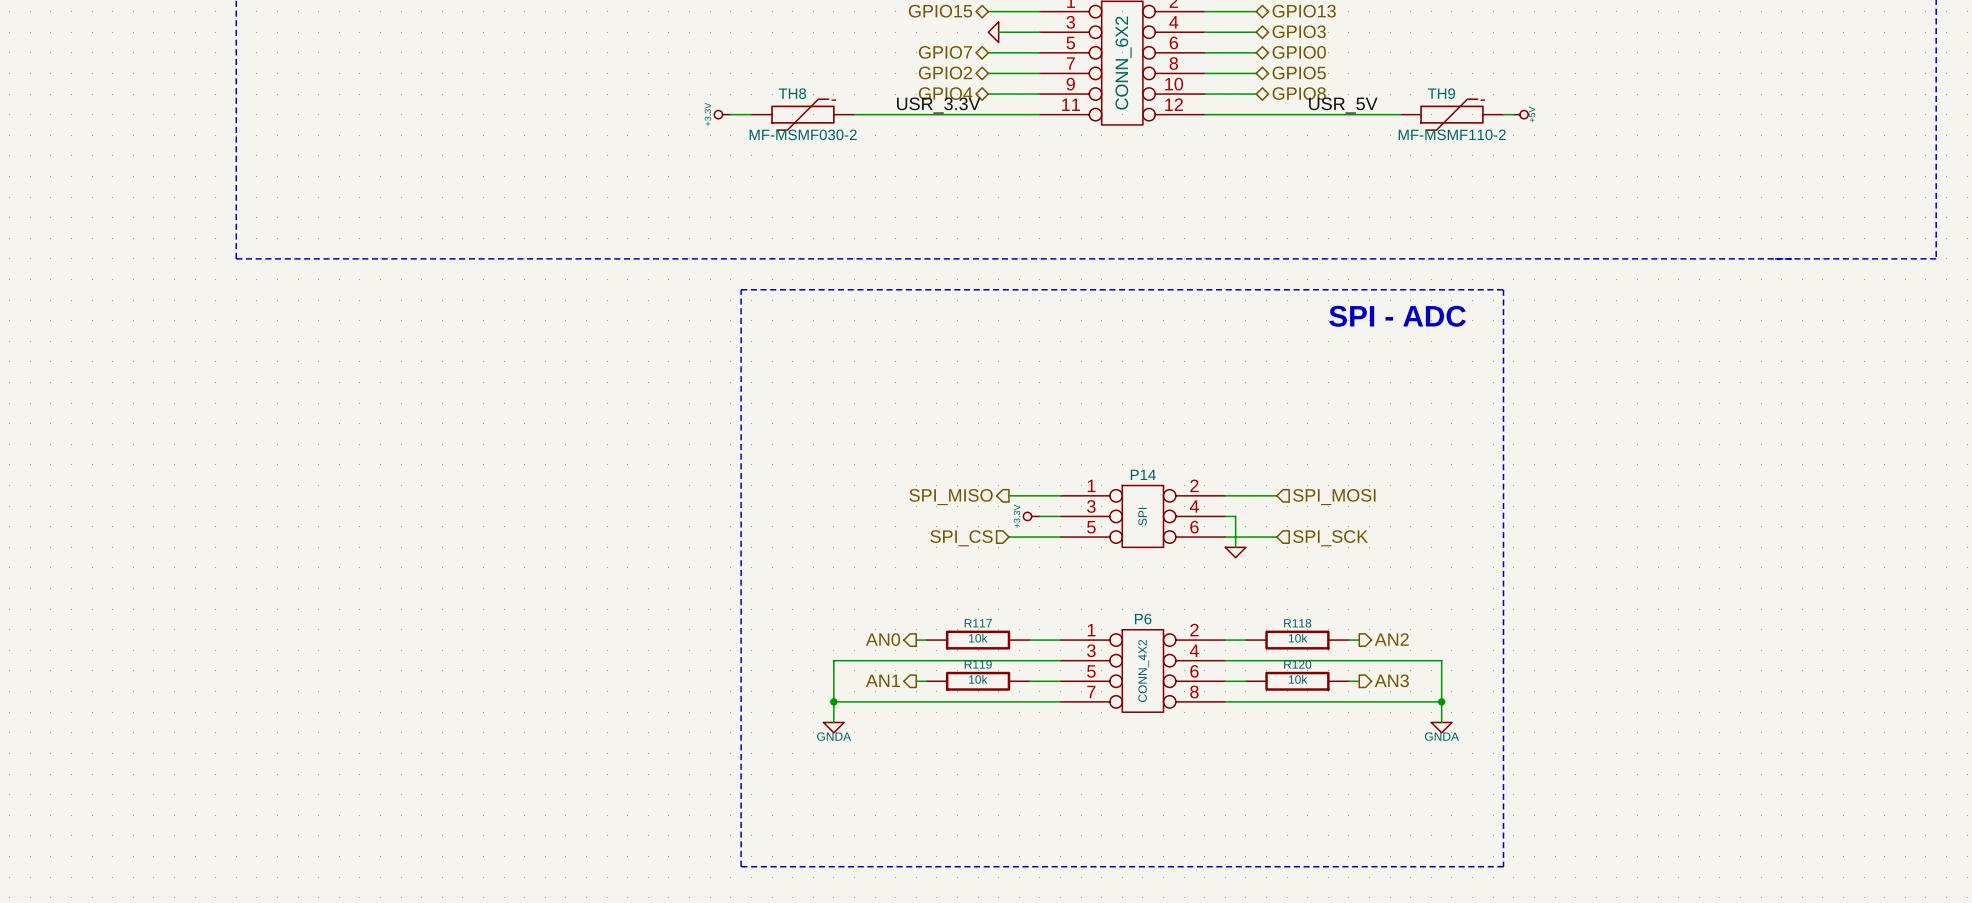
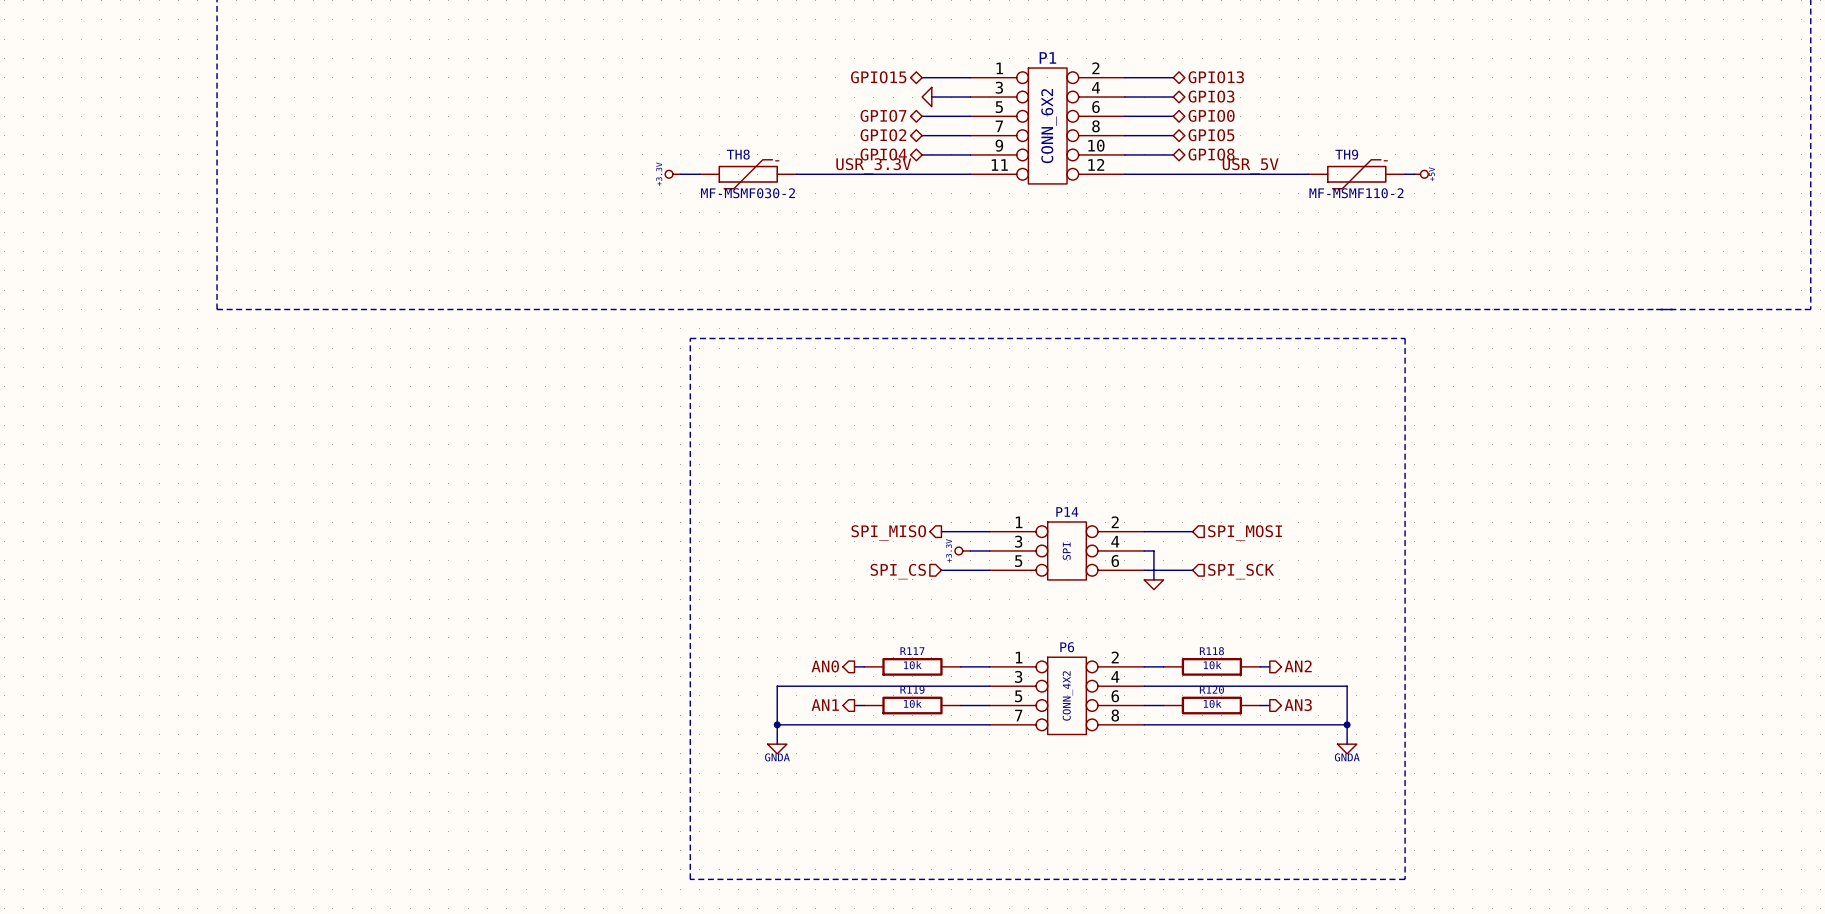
text: SPI - ADC (1397, 316) -> none

